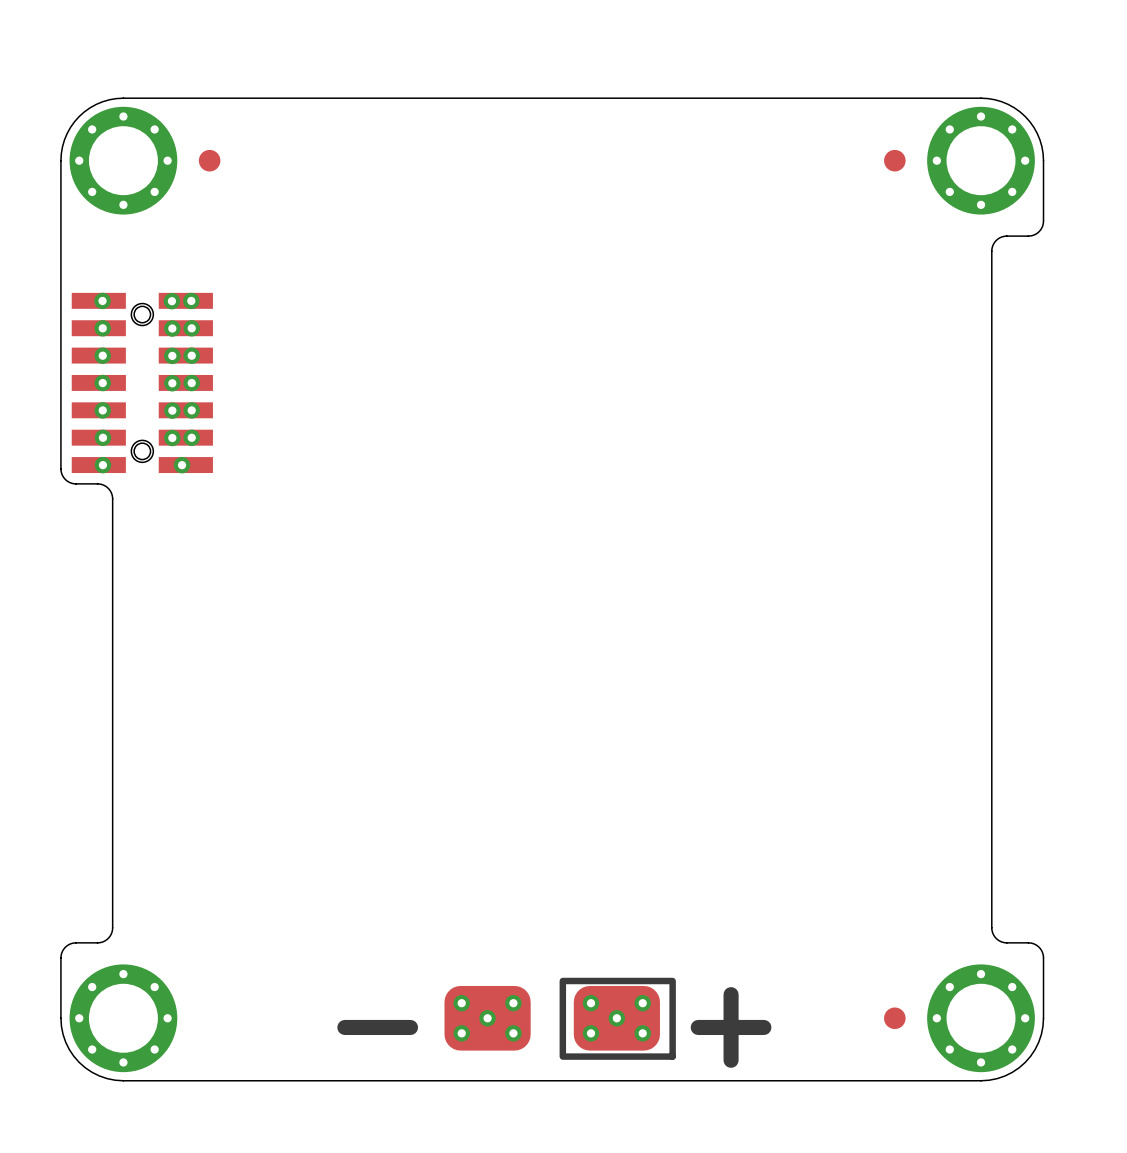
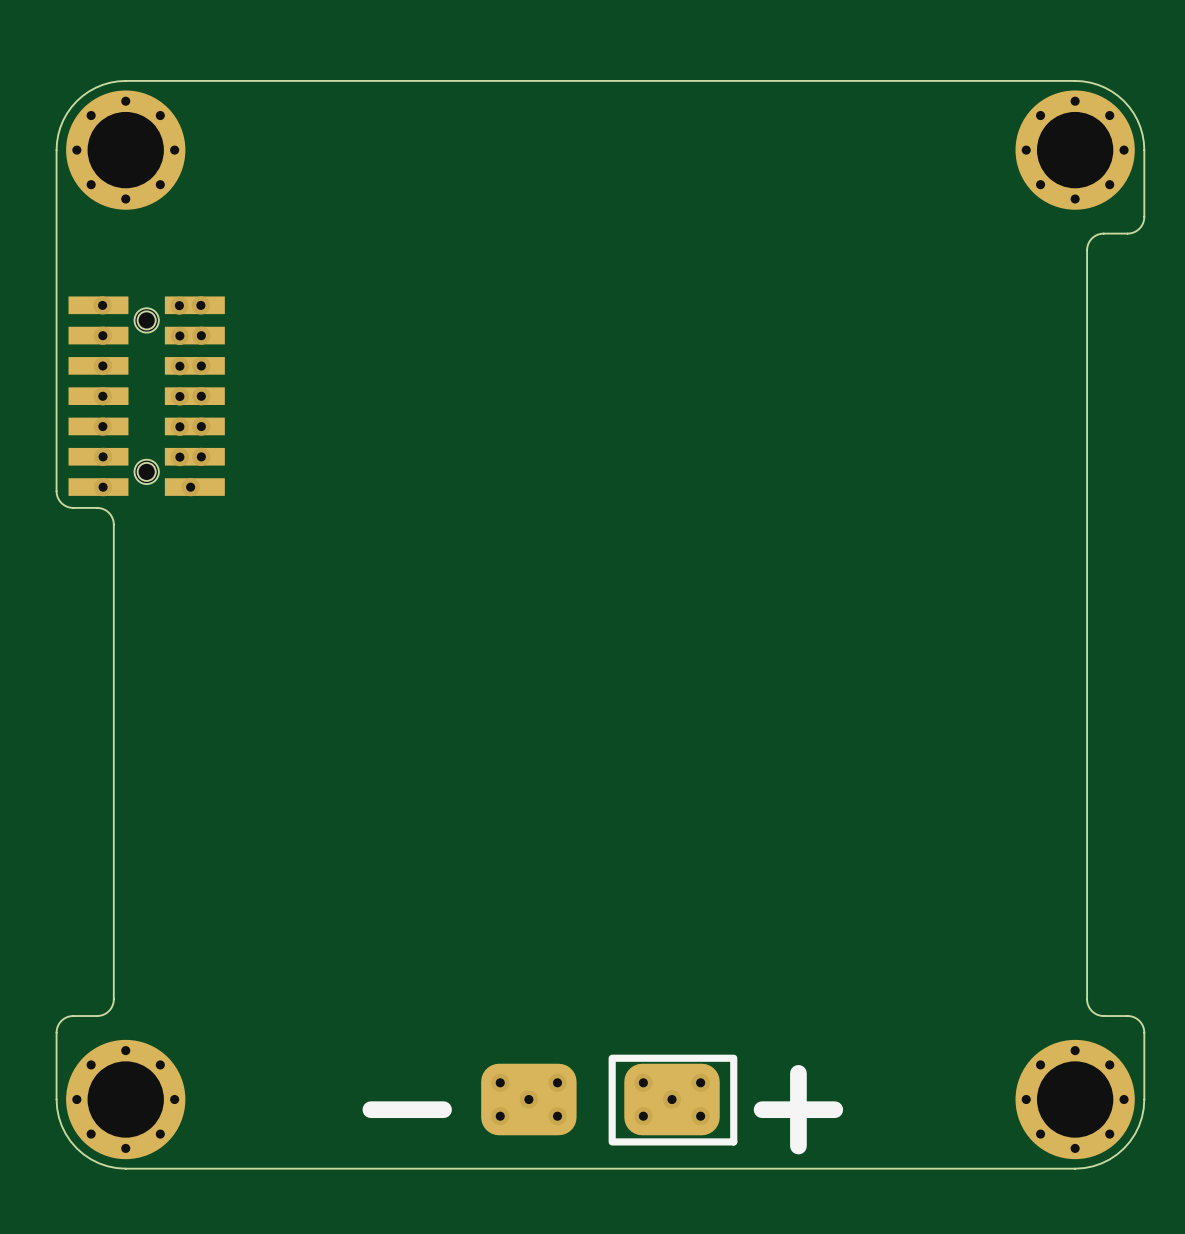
part: (209, 160) -> none
part: (894, 160) -> none
part: (894, 1018) -> none

